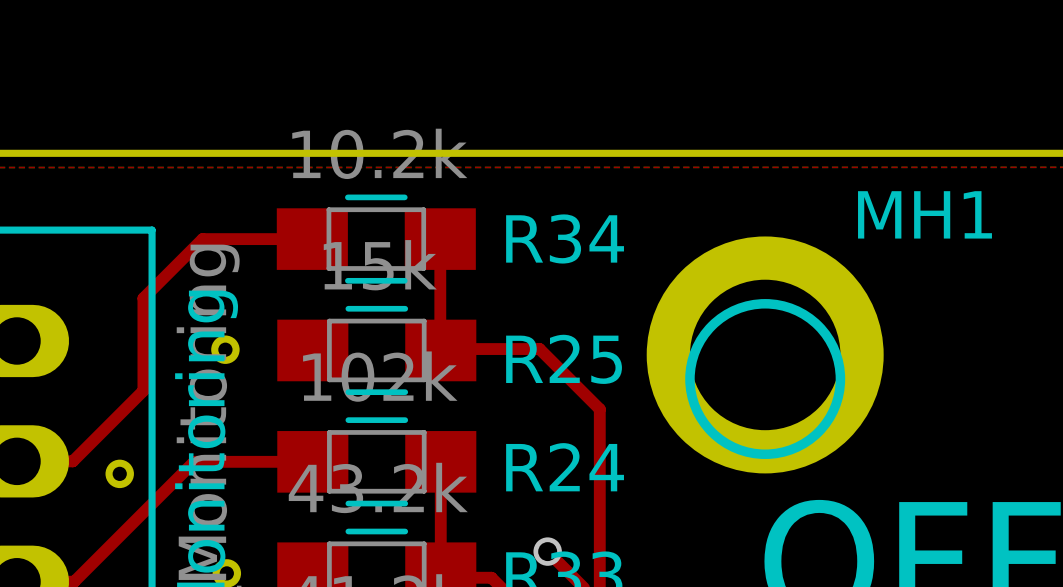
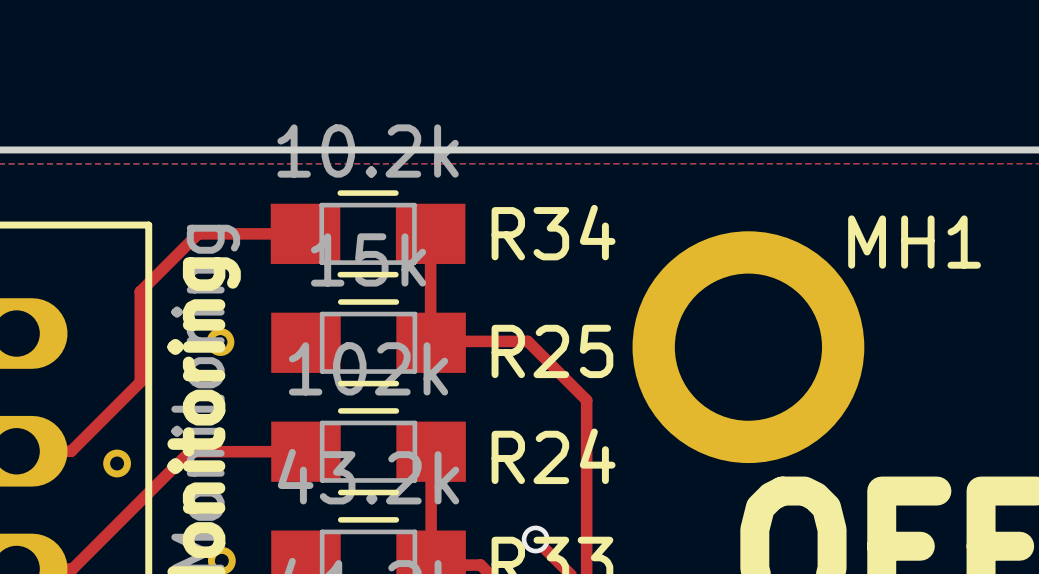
MH1 name position: MH1 (924, 214) -> MH1 (914, 242)
drawing: [685, 299, 846, 459] -> none

